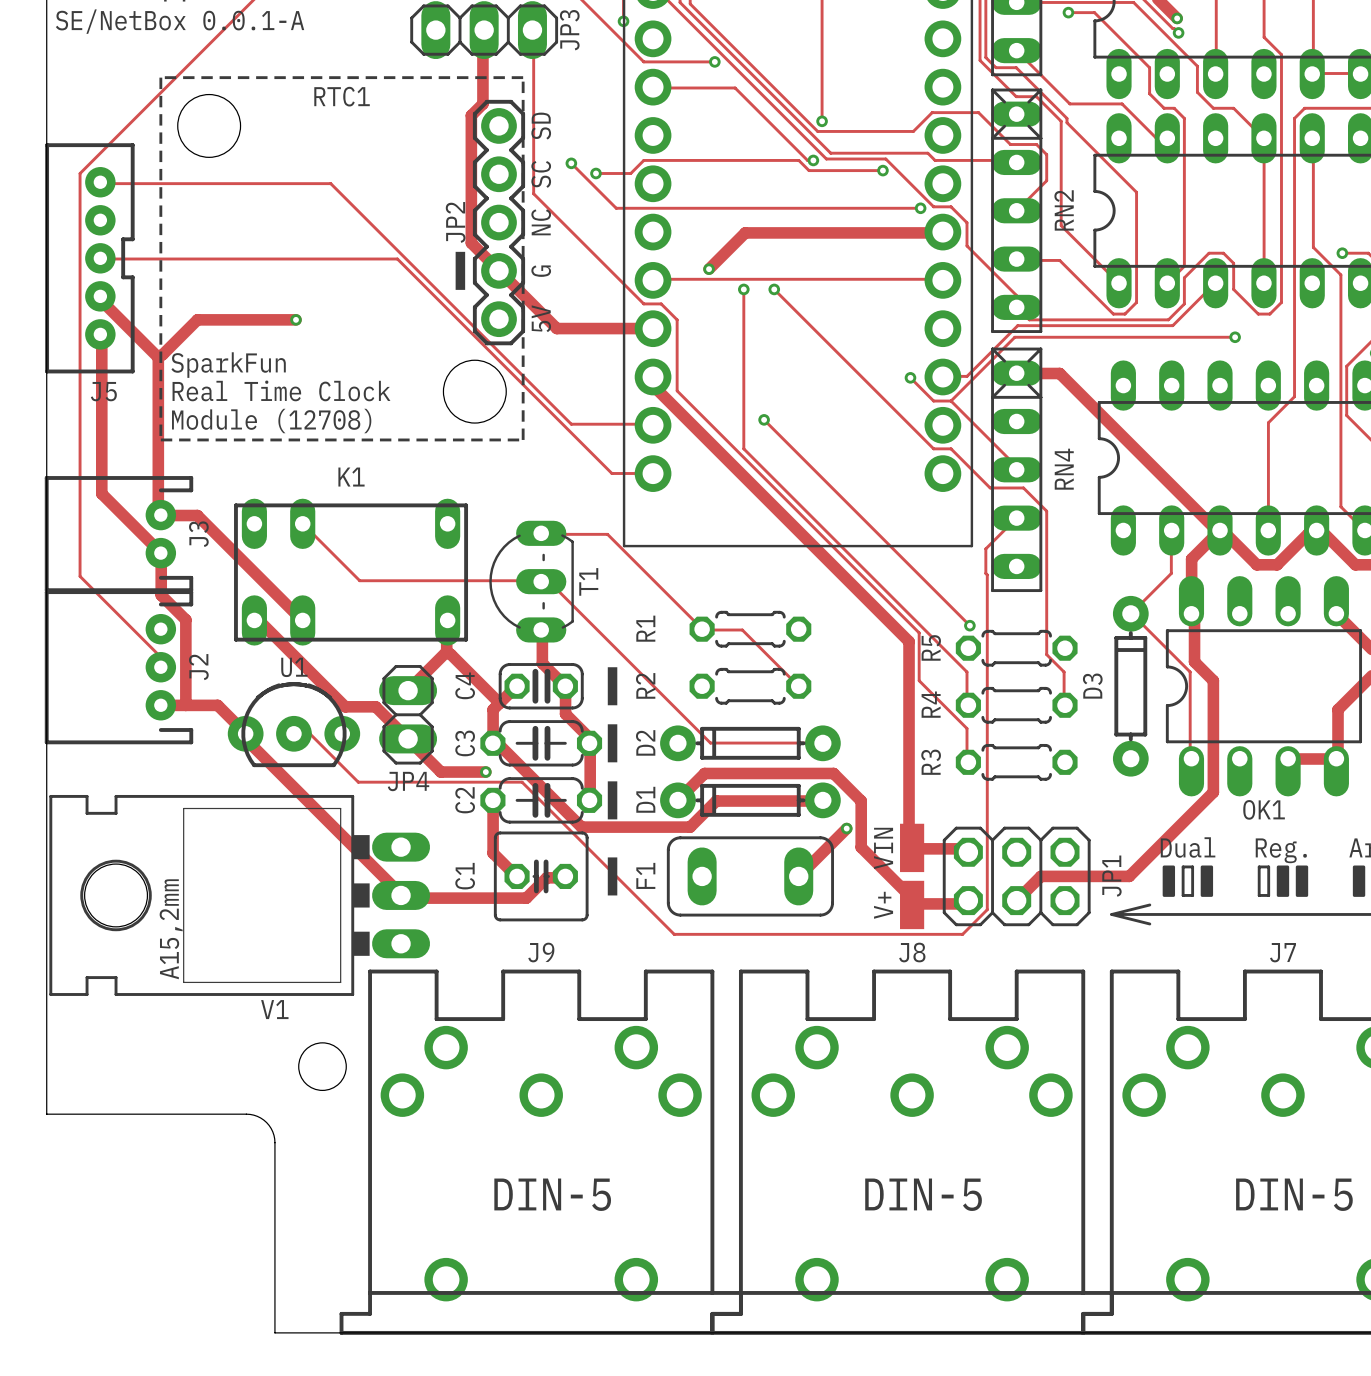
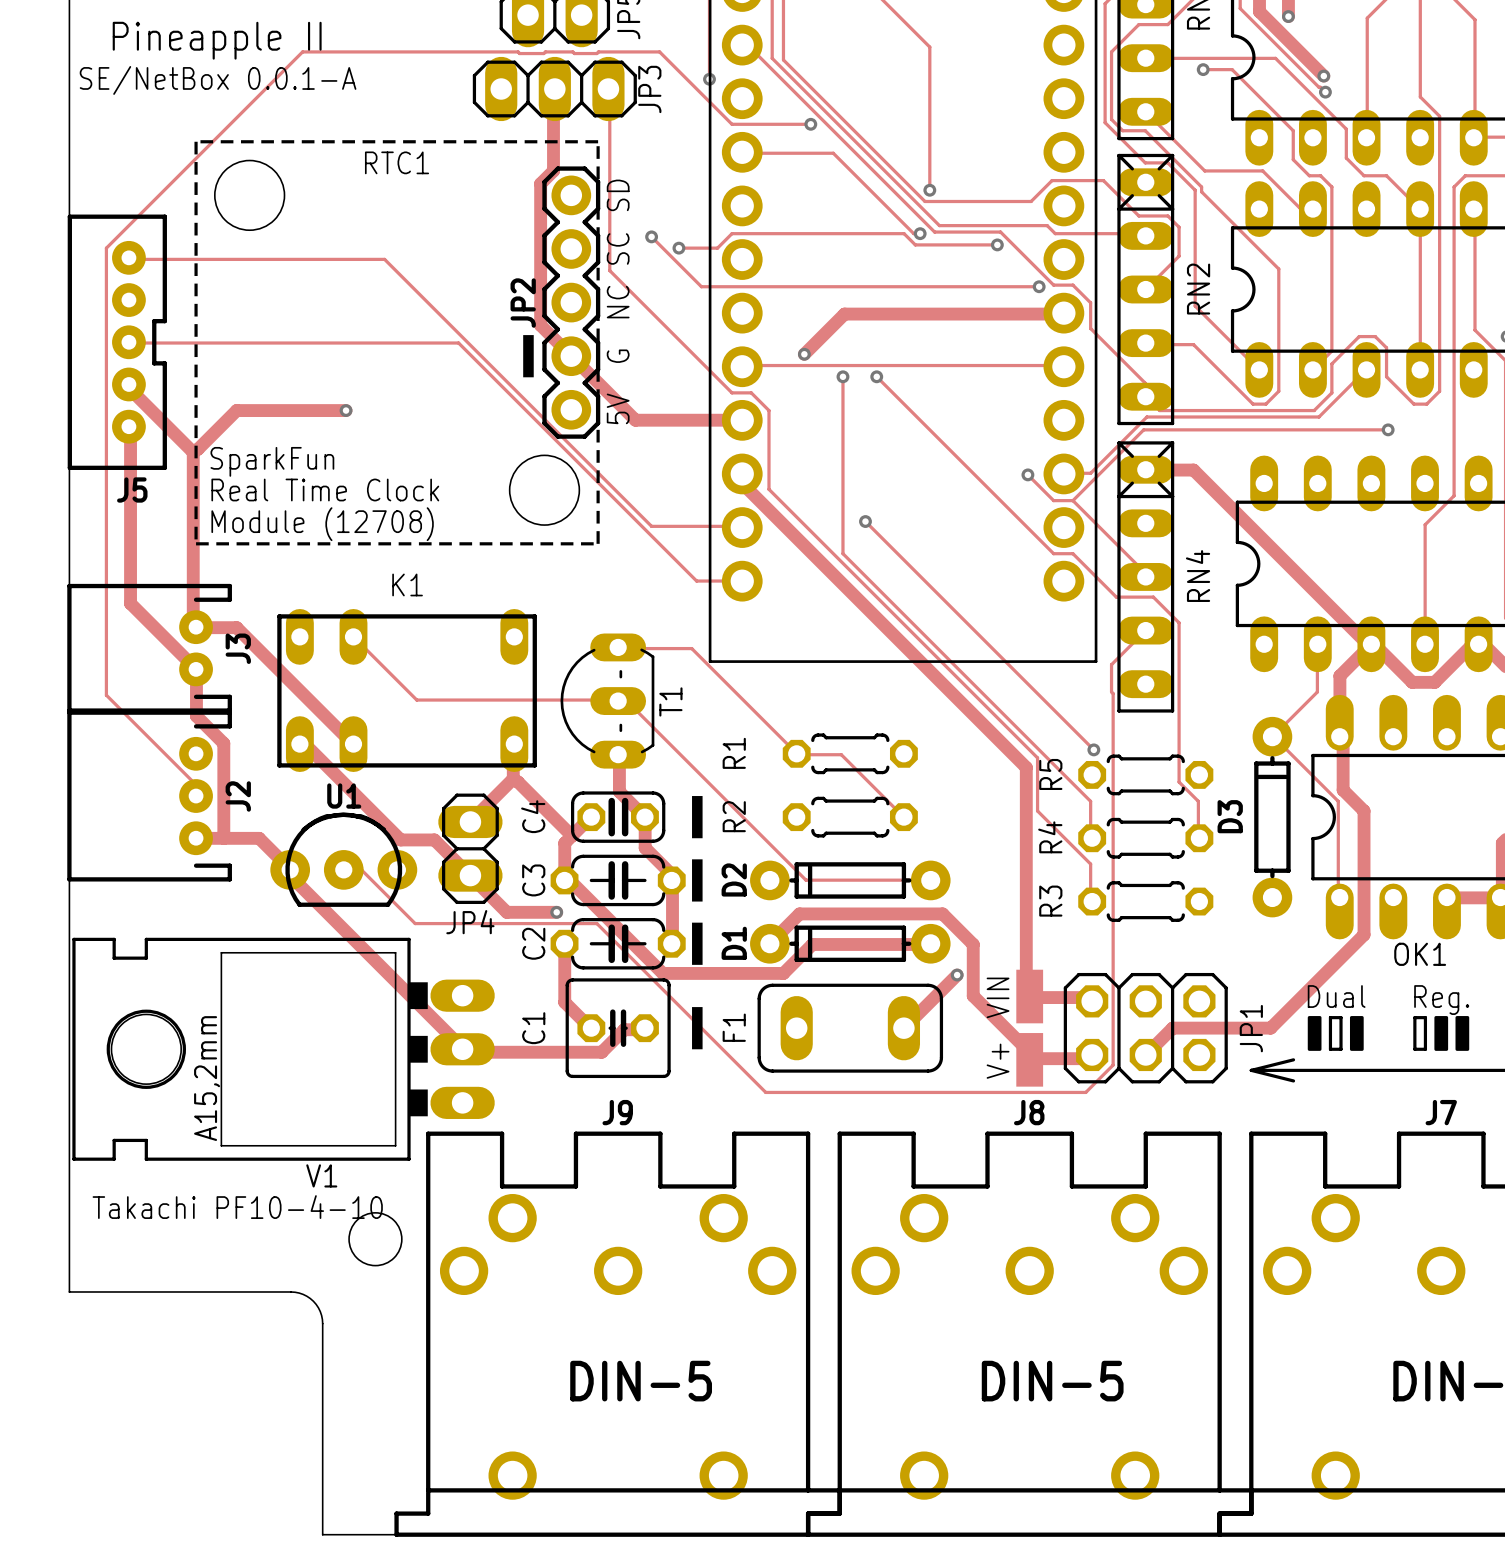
text: none -> Takachi PF10-4-10 (237, 1207)

